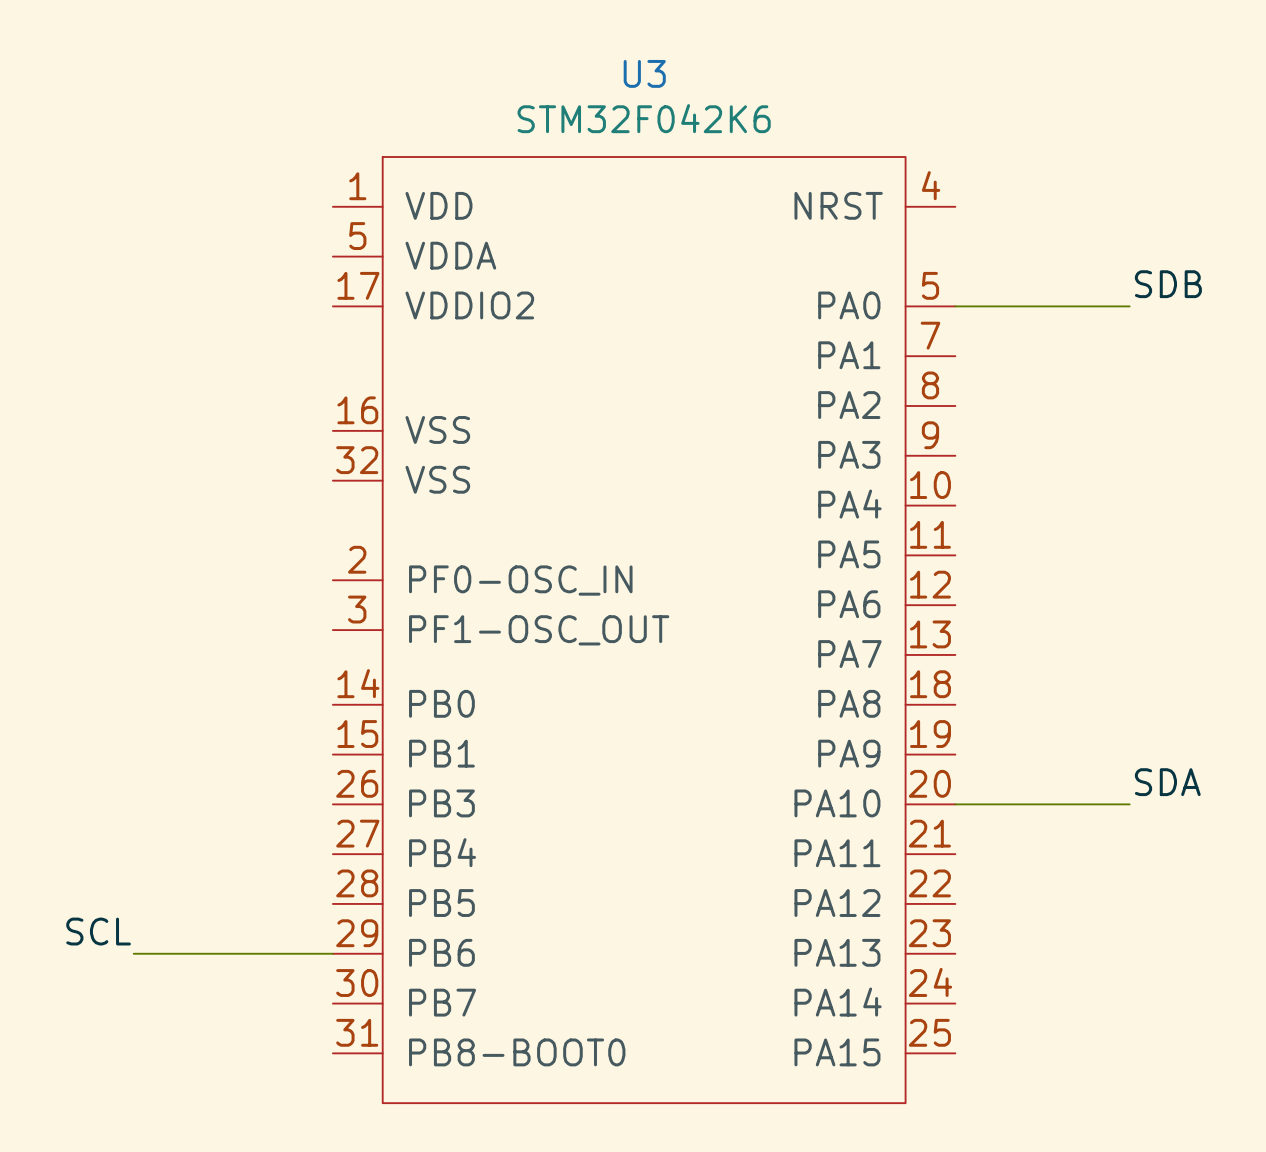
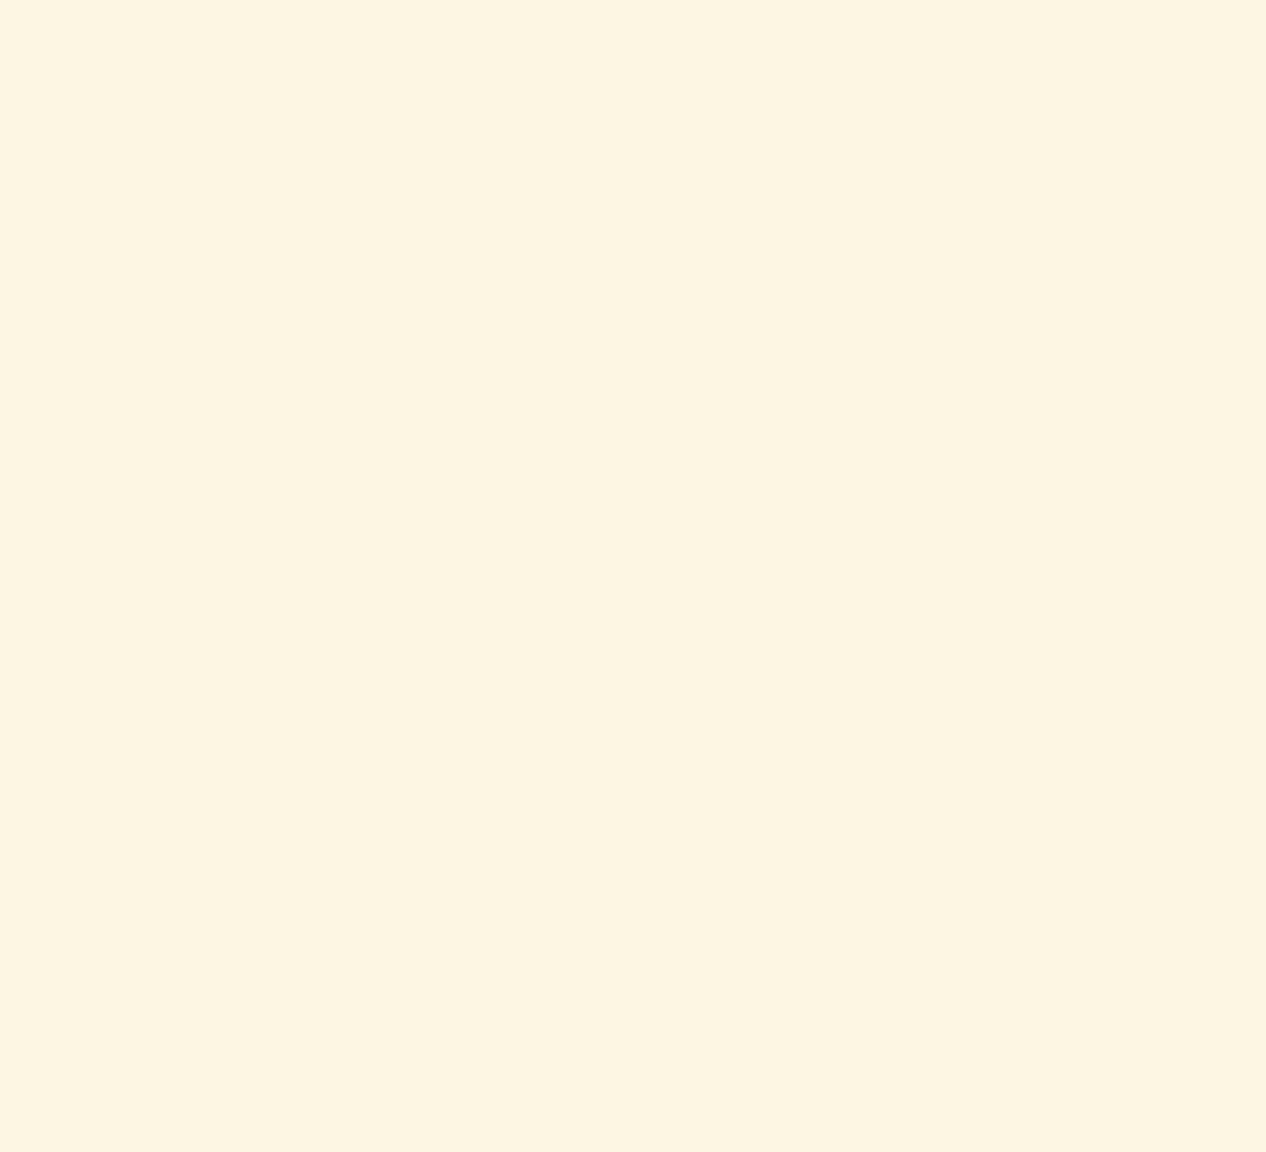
label: SDB (1168, 284) -> none
wire: (955, 306) (1129, 306) -> none
U3: STM32F042K6 (644, 630) -> none
label: SDA (1167, 782) -> none
wire: (955, 804) (1129, 804) -> none
label: SCL (98, 931) -> none
wire: (133, 953) (332, 953) -> none

